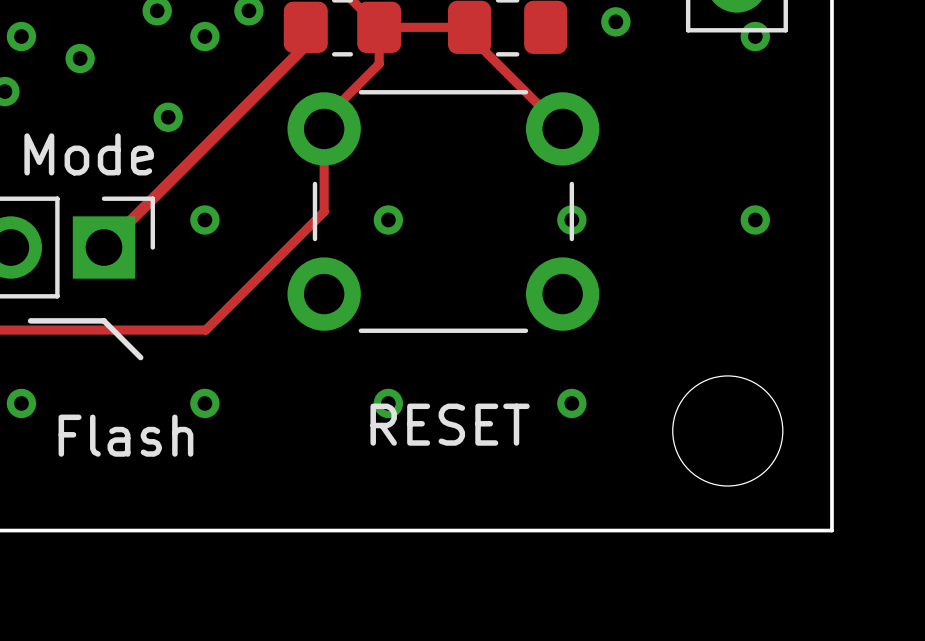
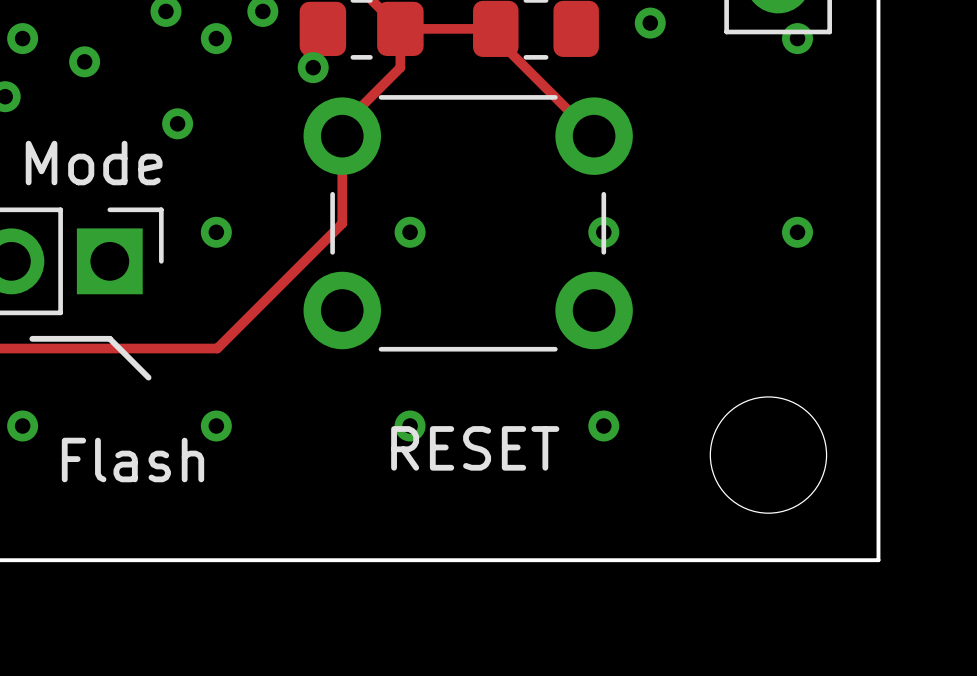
track: (305, 45) (104, 247) -> none
via: none -> (313, 67)

